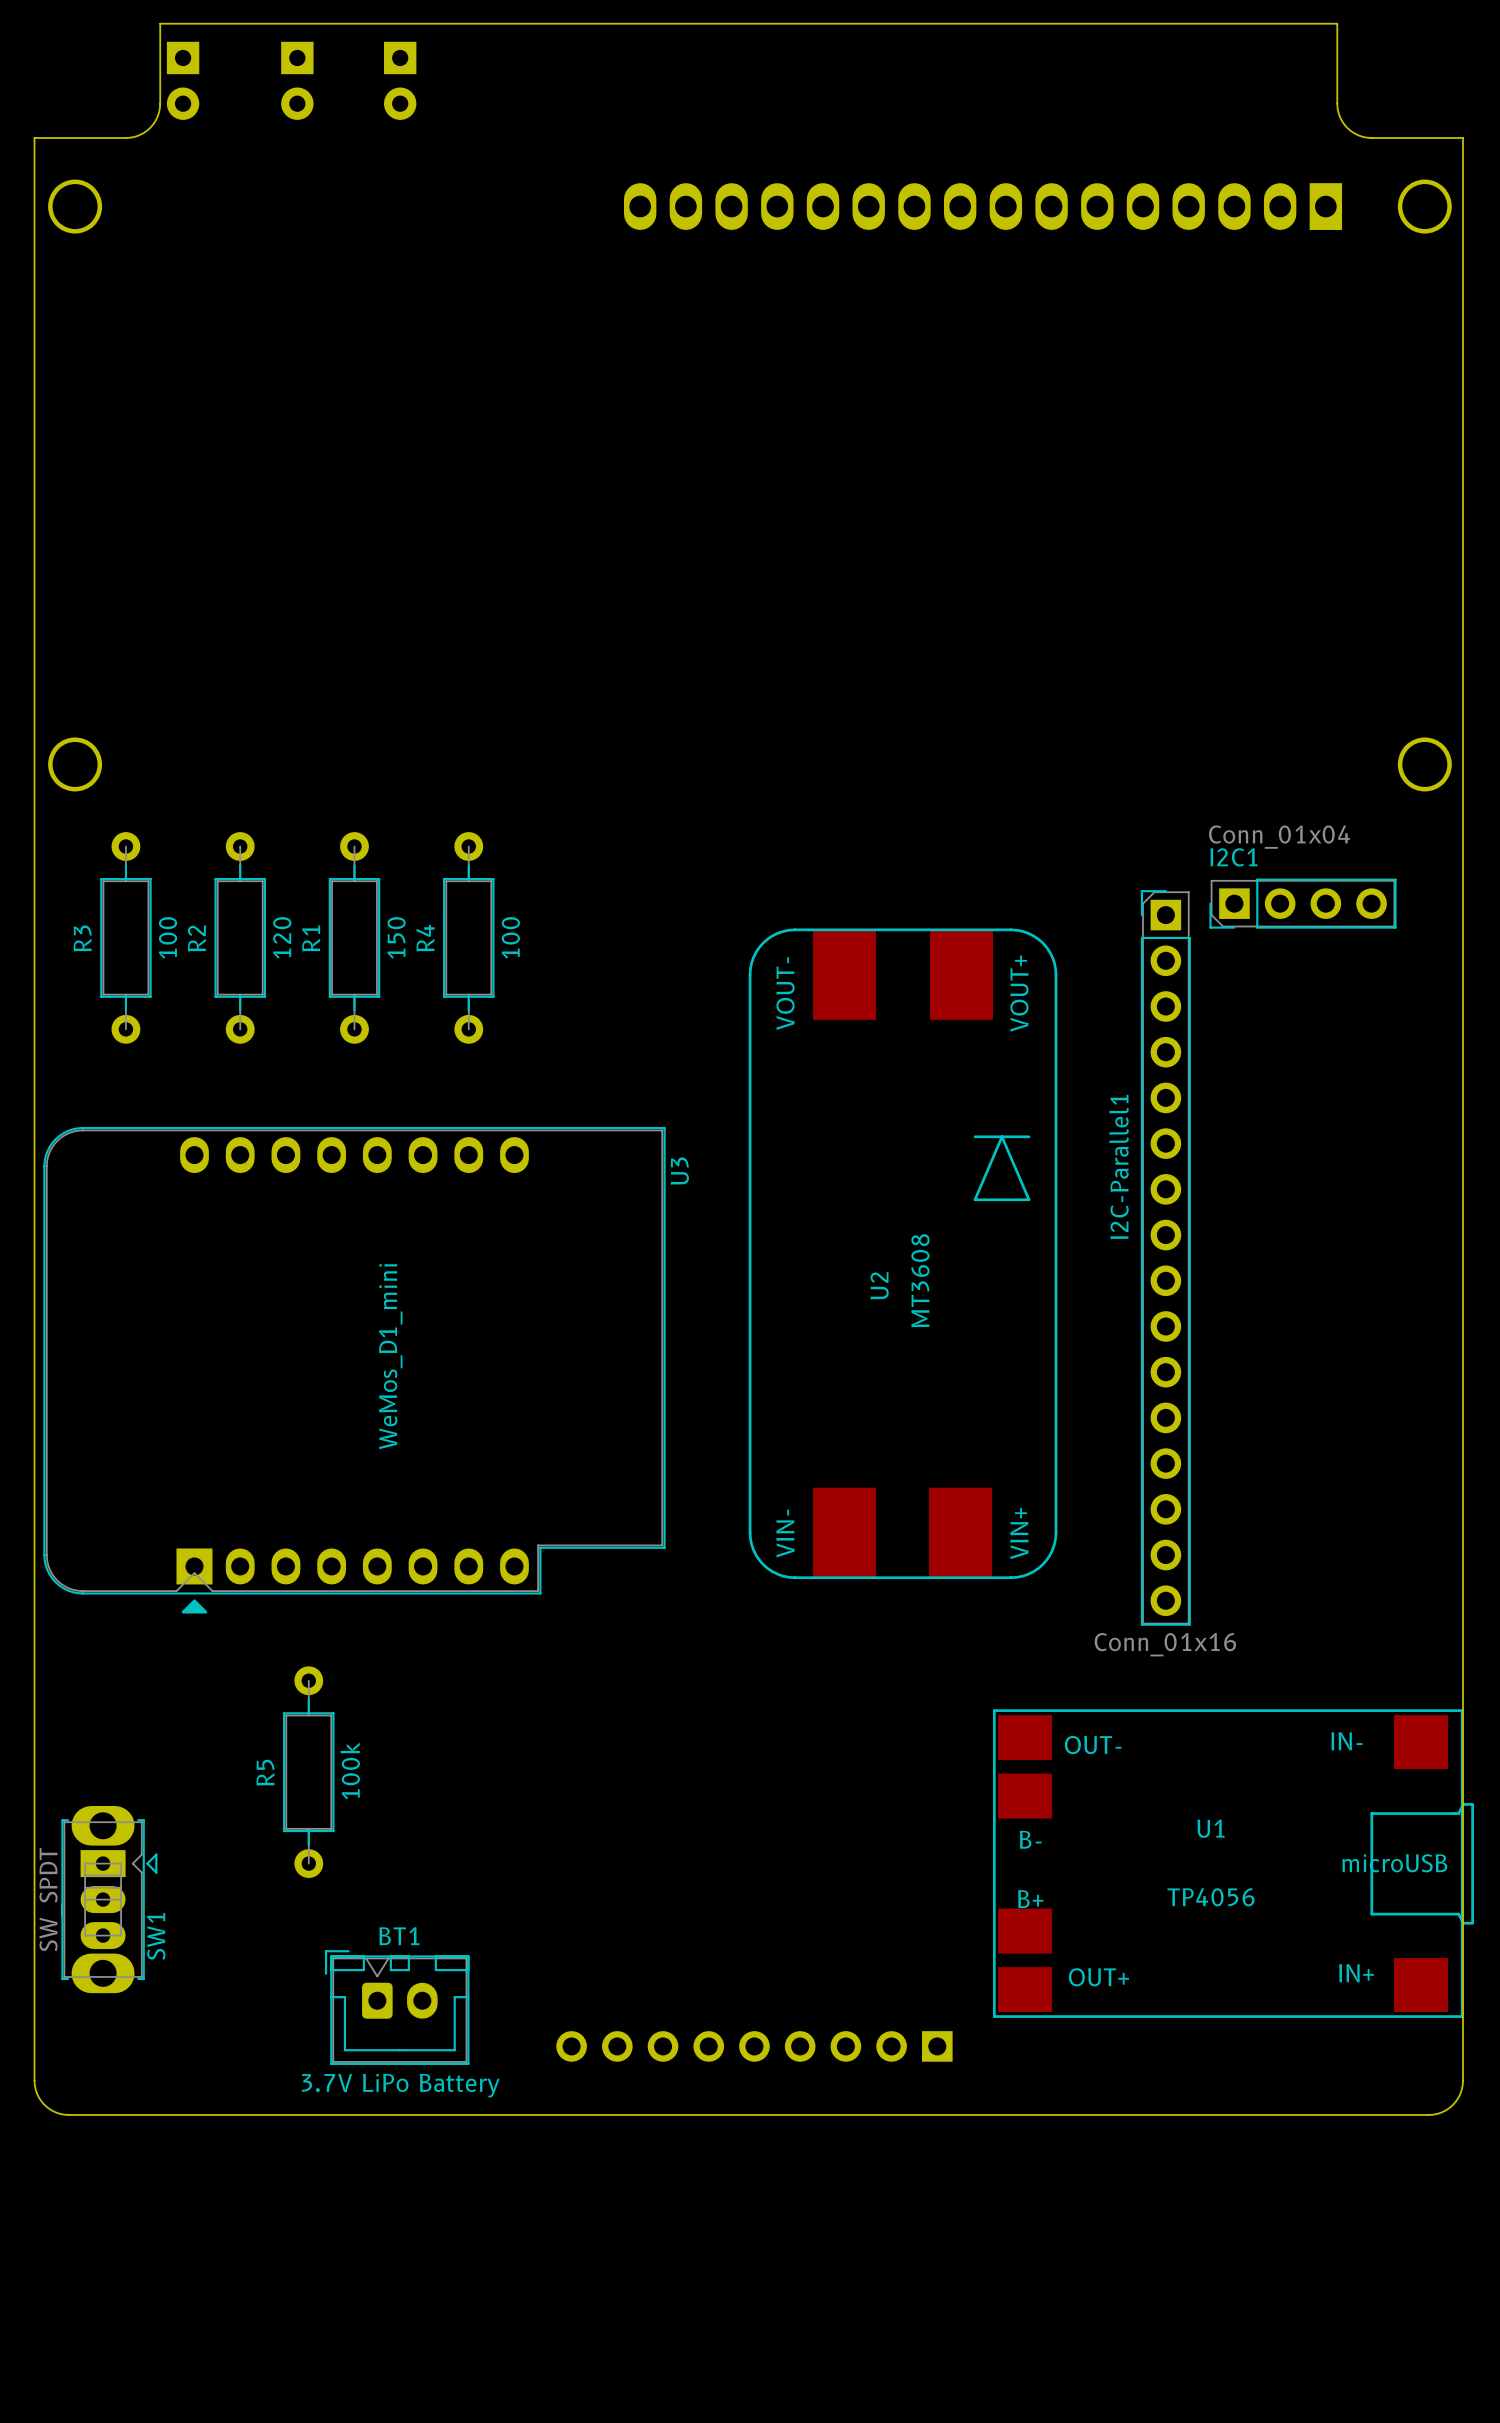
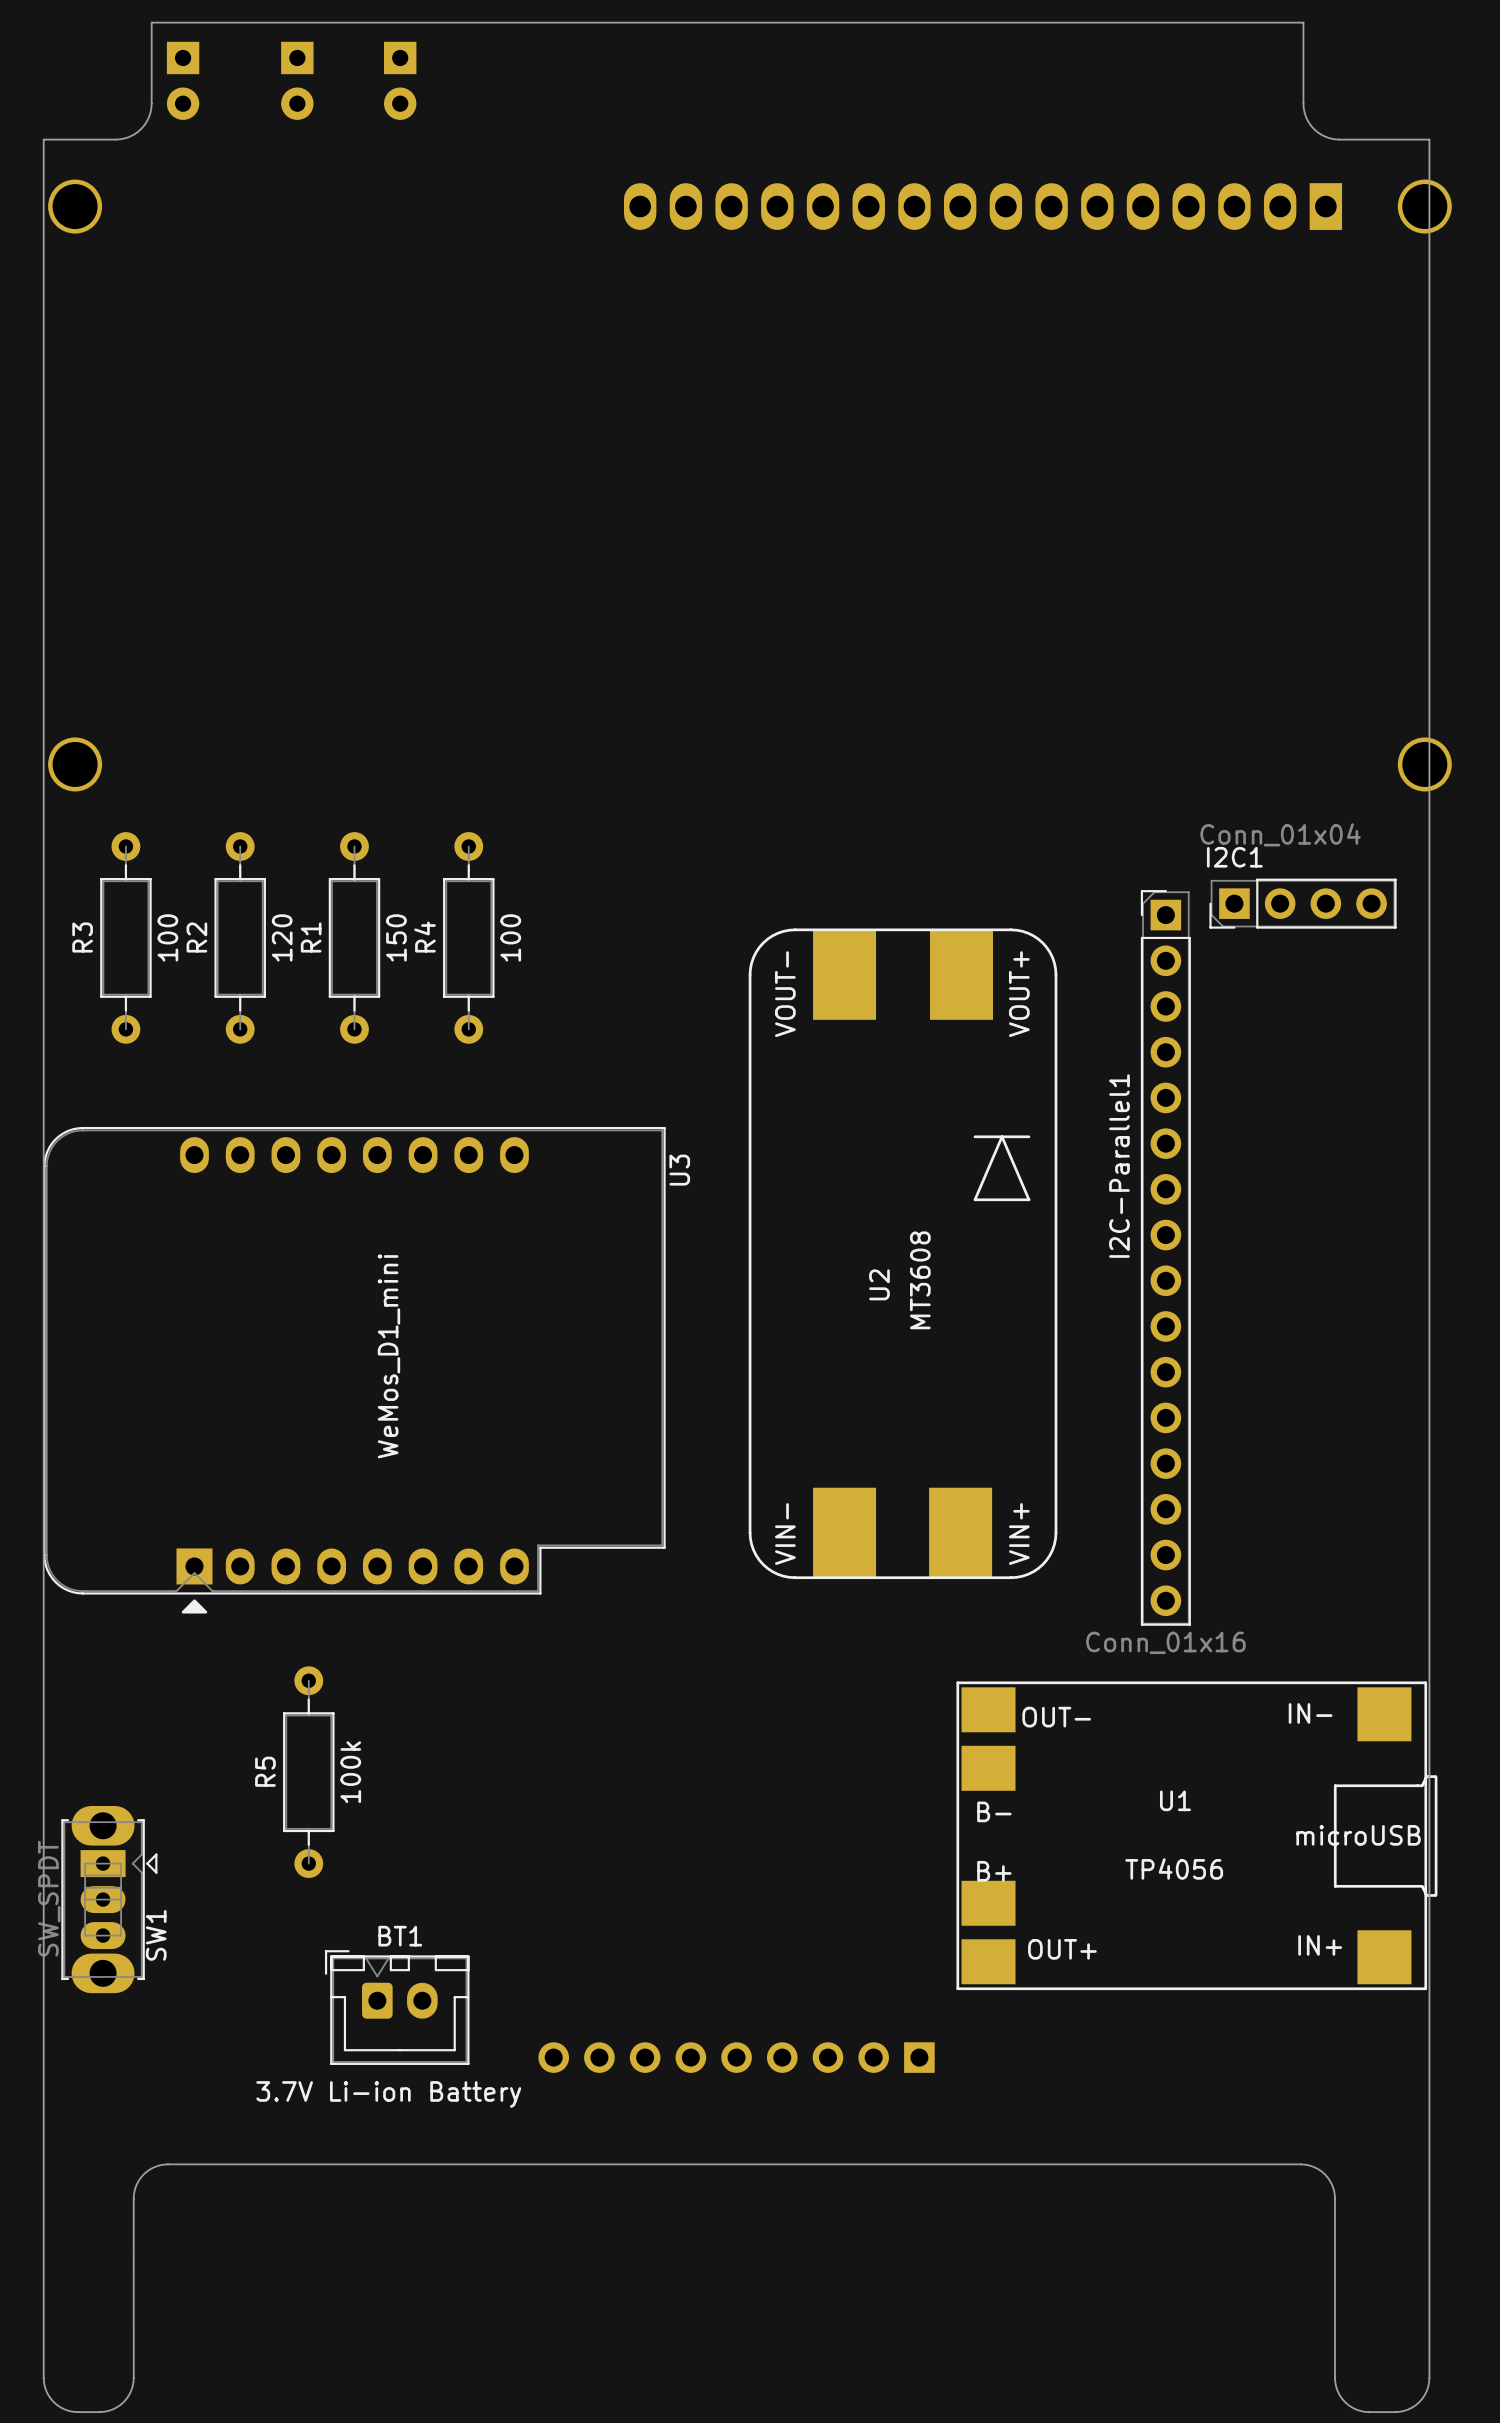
board edge: none -> (151, 22) (151, 108) (146, 121) (141, 129) (129, 136) (120, 139) (43, 139) (43, 2377) (48, 2394) (60, 2407) (77, 2412) (108, 2410) (120, 2405) (129, 2394) (133, 2377) (134, 2194) (138, 2181) (143, 2174) (150, 2168) (163, 2164) (1300, 2164) (1313, 2166) (1324, 2174) (1330, 2181) (1334, 2194) (1335, 2377) (1337, 2390) (1348, 2405) (1360, 2410) (1399, 2411) (1412, 2407) (1424, 2394) (1429, 2377) (1429, 139) (1334, 139) (1321, 134) (1313, 129) (1306, 117) (1303, 108) (1303, 22) (151, 22)
U1 position: (1233, 1863) -> (1196, 1835)
part position: (754, 2046) -> (736, 2057)
board edge: (1462, 2080) (1460, 2093) (1452, 2104) (1441, 2112) (1428, 2115) (68, 2115) -> none
board edge: (1462, 2080) (1462, 137) (1367, 137) (1354, 133) (1347, 127) (1341, 120) (1337, 108) (1337, 23) (160, 23) (159, 108) (155, 120) (150, 127) (143, 133) (130, 137) (34, 137) (34, 2080) (37, 2093) (44, 2104) (55, 2112) (68, 2115) -> none
BT1 value: 3.7V LiPo Battery (400, 2085) -> 3.7V Li-ion Battery (388, 2094)

